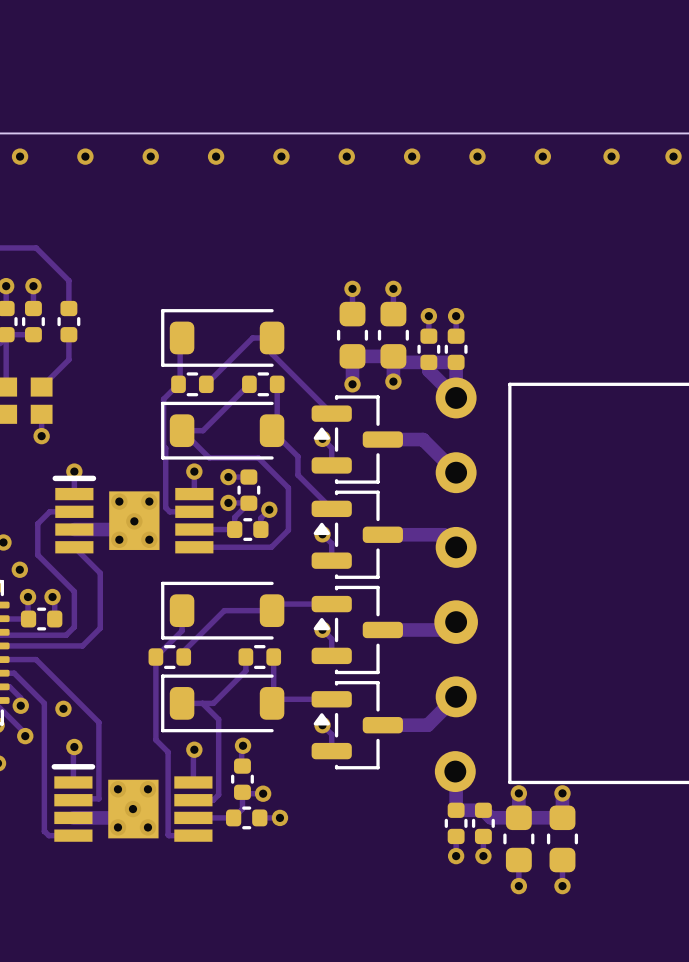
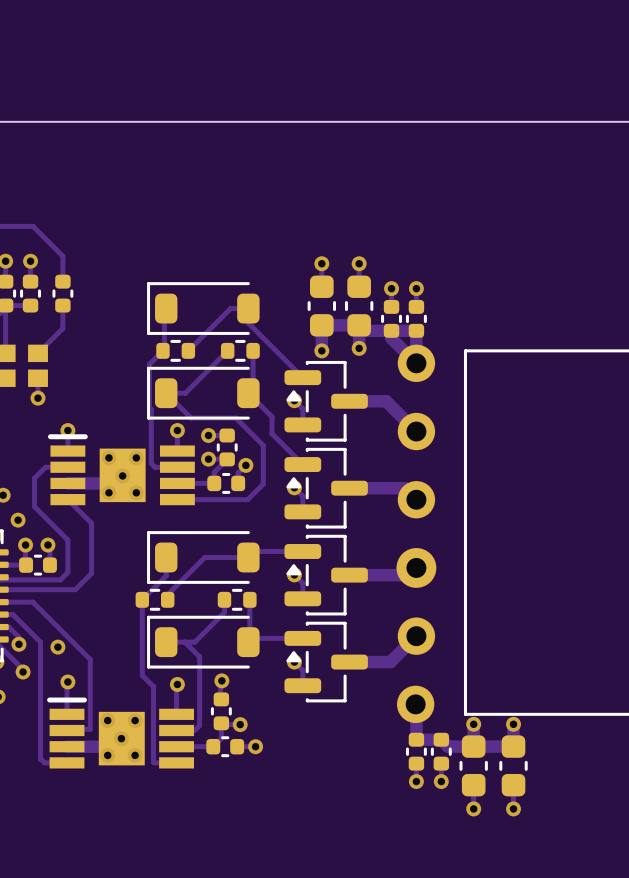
via: (20, 156) -> none
via: (85, 156) -> none
via: (150, 156) -> none
via: (216, 156) -> none
via: (281, 156) -> none
via: (346, 156) -> none
via: (412, 156) -> none
via: (477, 156) -> none
via: (542, 156) -> none
via: (611, 156) -> none
via: (673, 156) -> none

